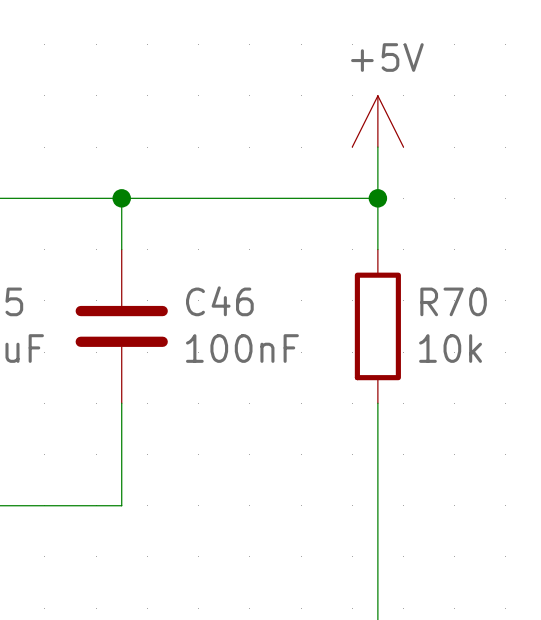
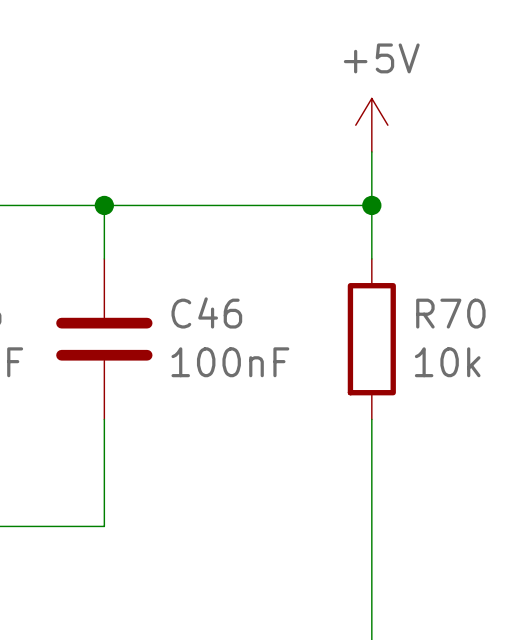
power symbol shape: [352, 95, 404, 148] -> [355, 98, 388, 152]

